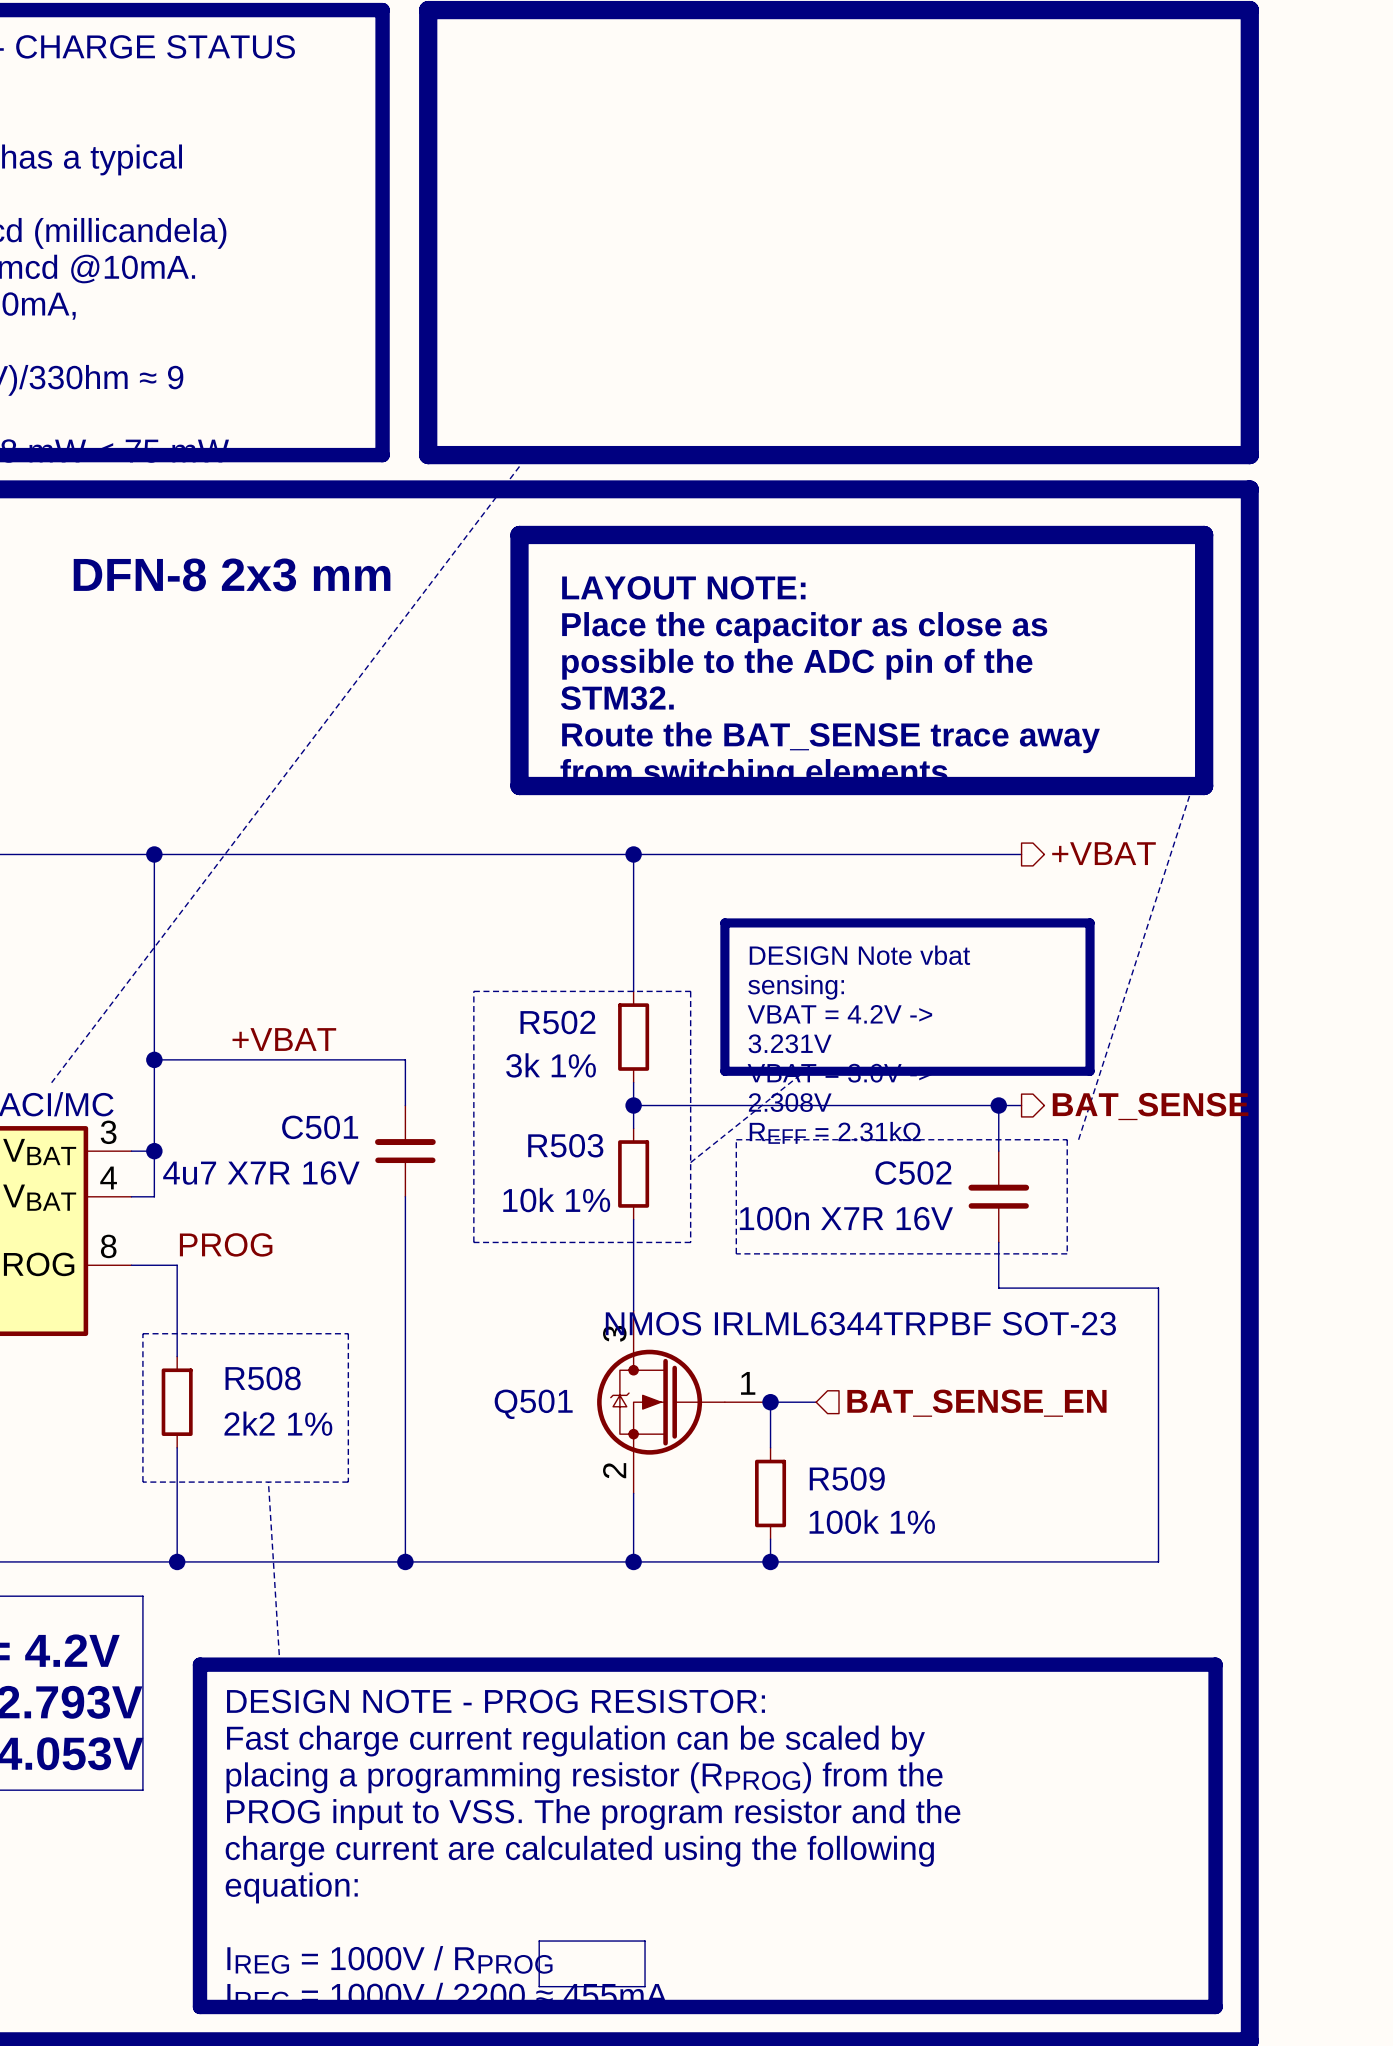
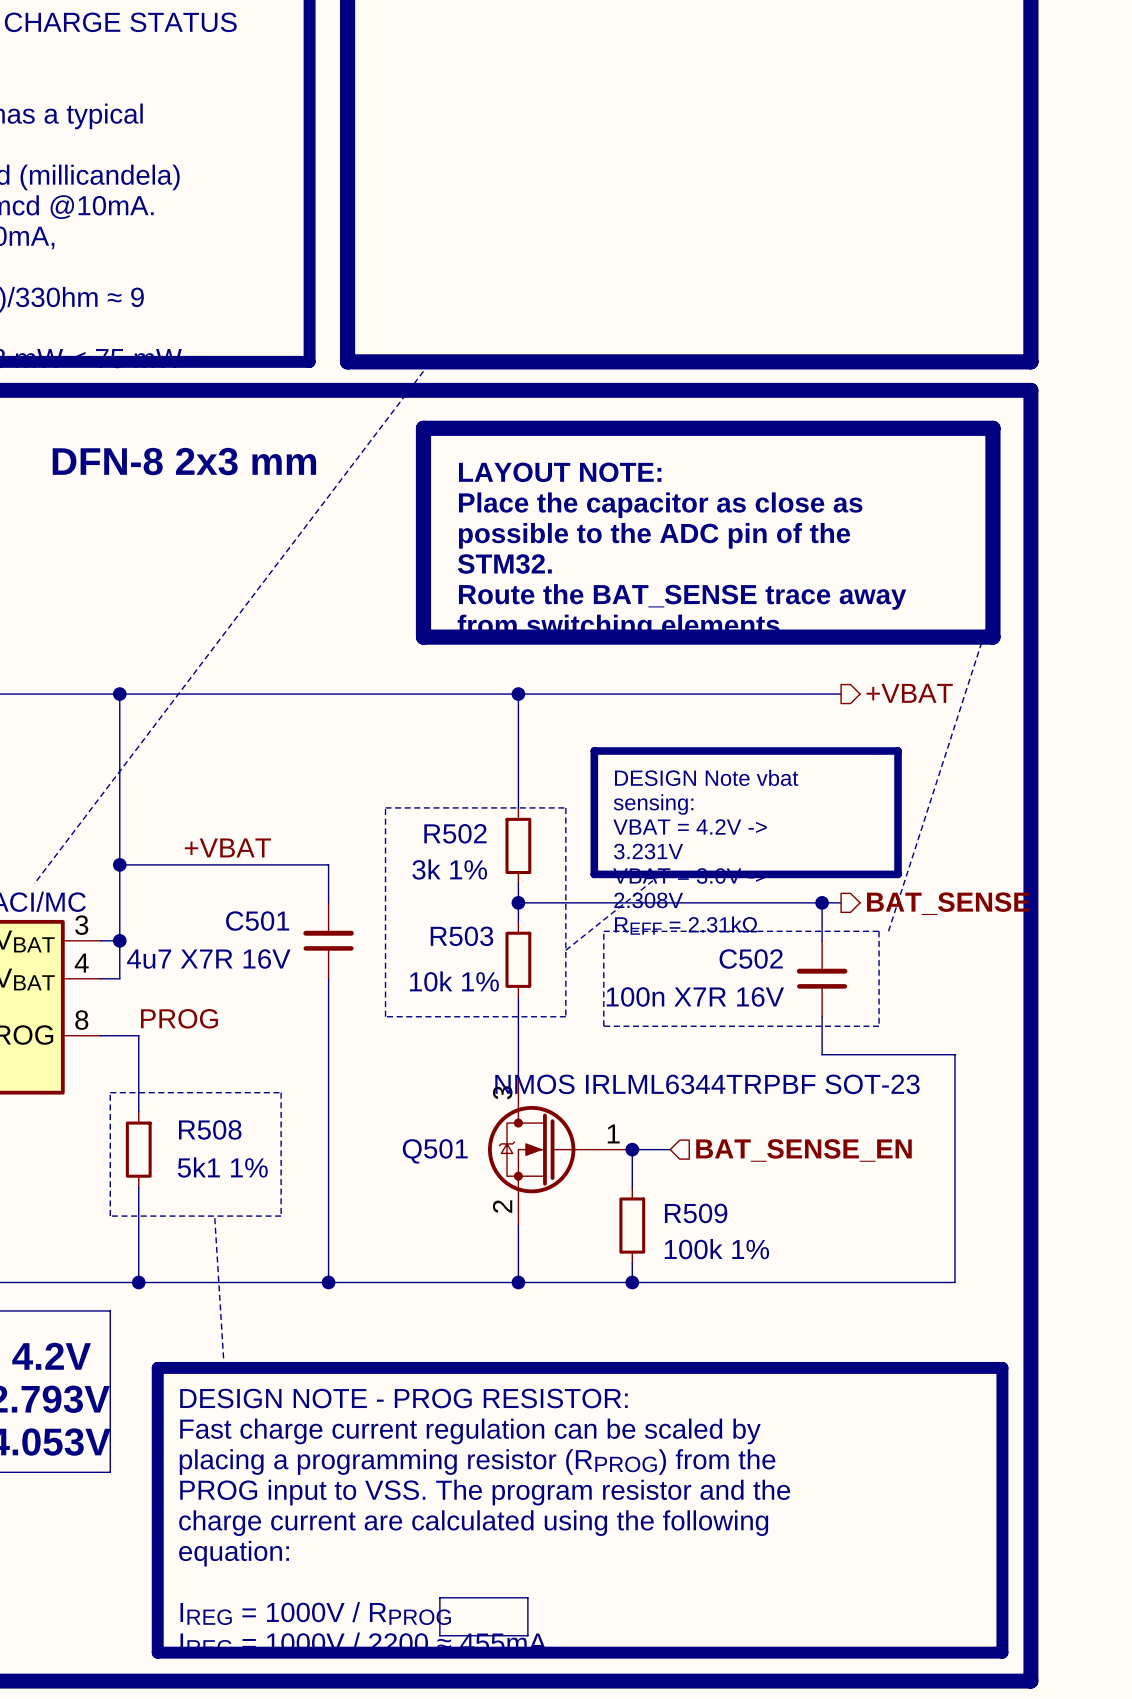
R508 value: 2k2 1% (278, 1423) -> 5k1 1% (222, 1167)

